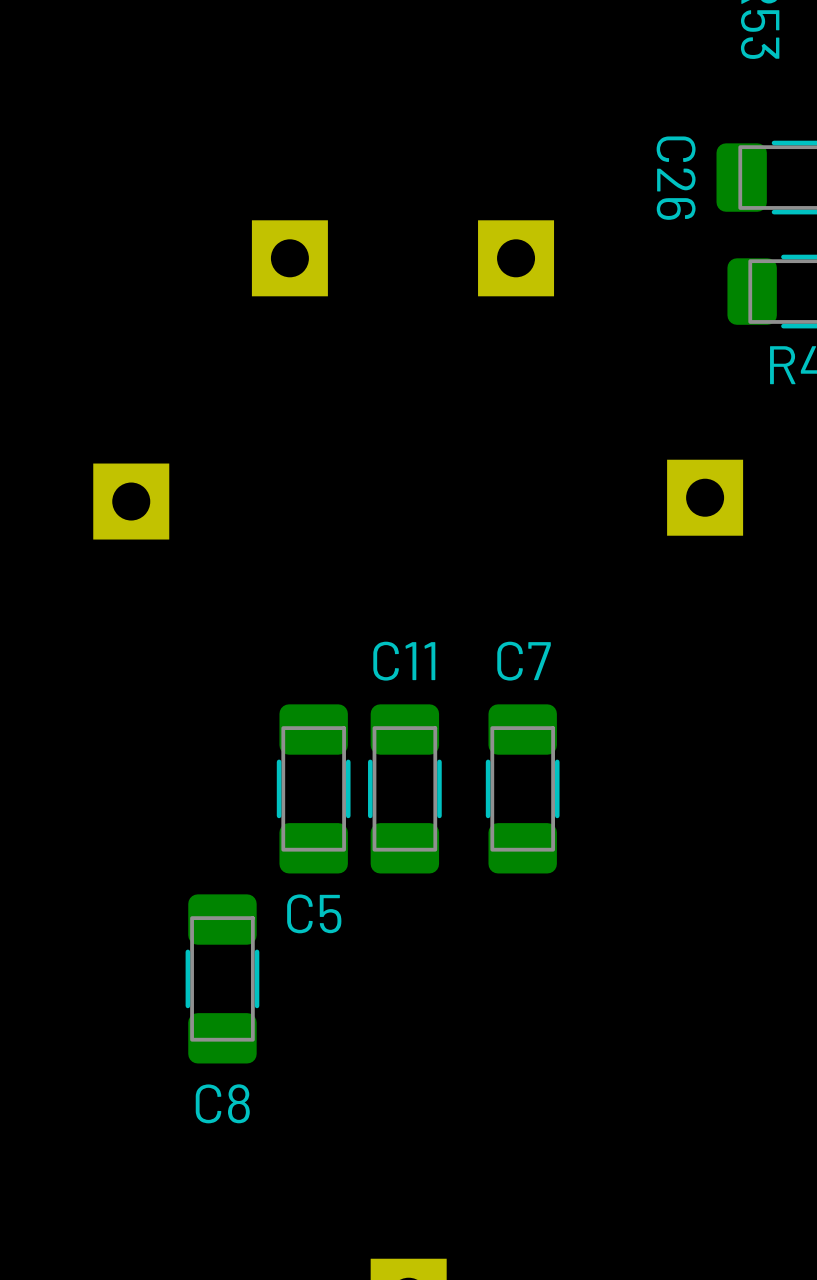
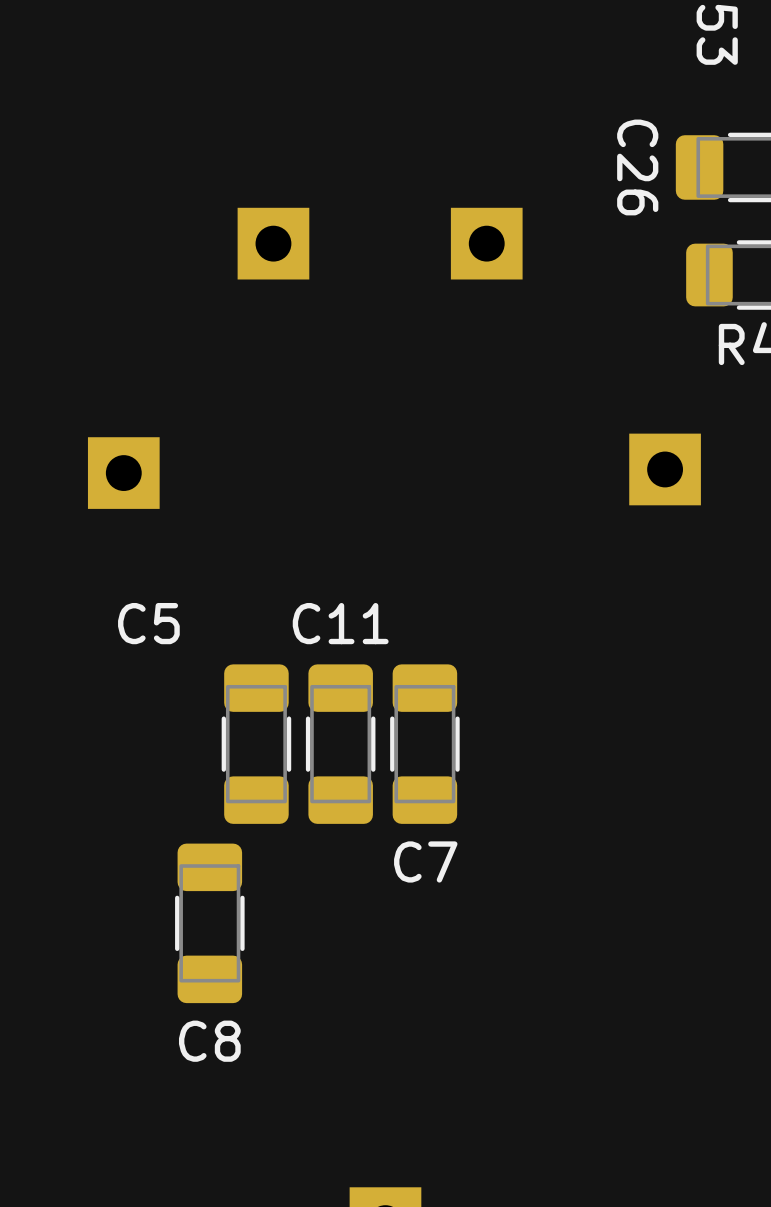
C7 name position: C7 (524, 661) -> C7 (425, 861)
C5 position: (313, 788) -> (256, 744)
C11 position: (404, 788) -> (340, 744)
C7 position: (522, 788) -> (424, 744)
C5 name position: C5 (314, 913) -> C5 (148, 623)

